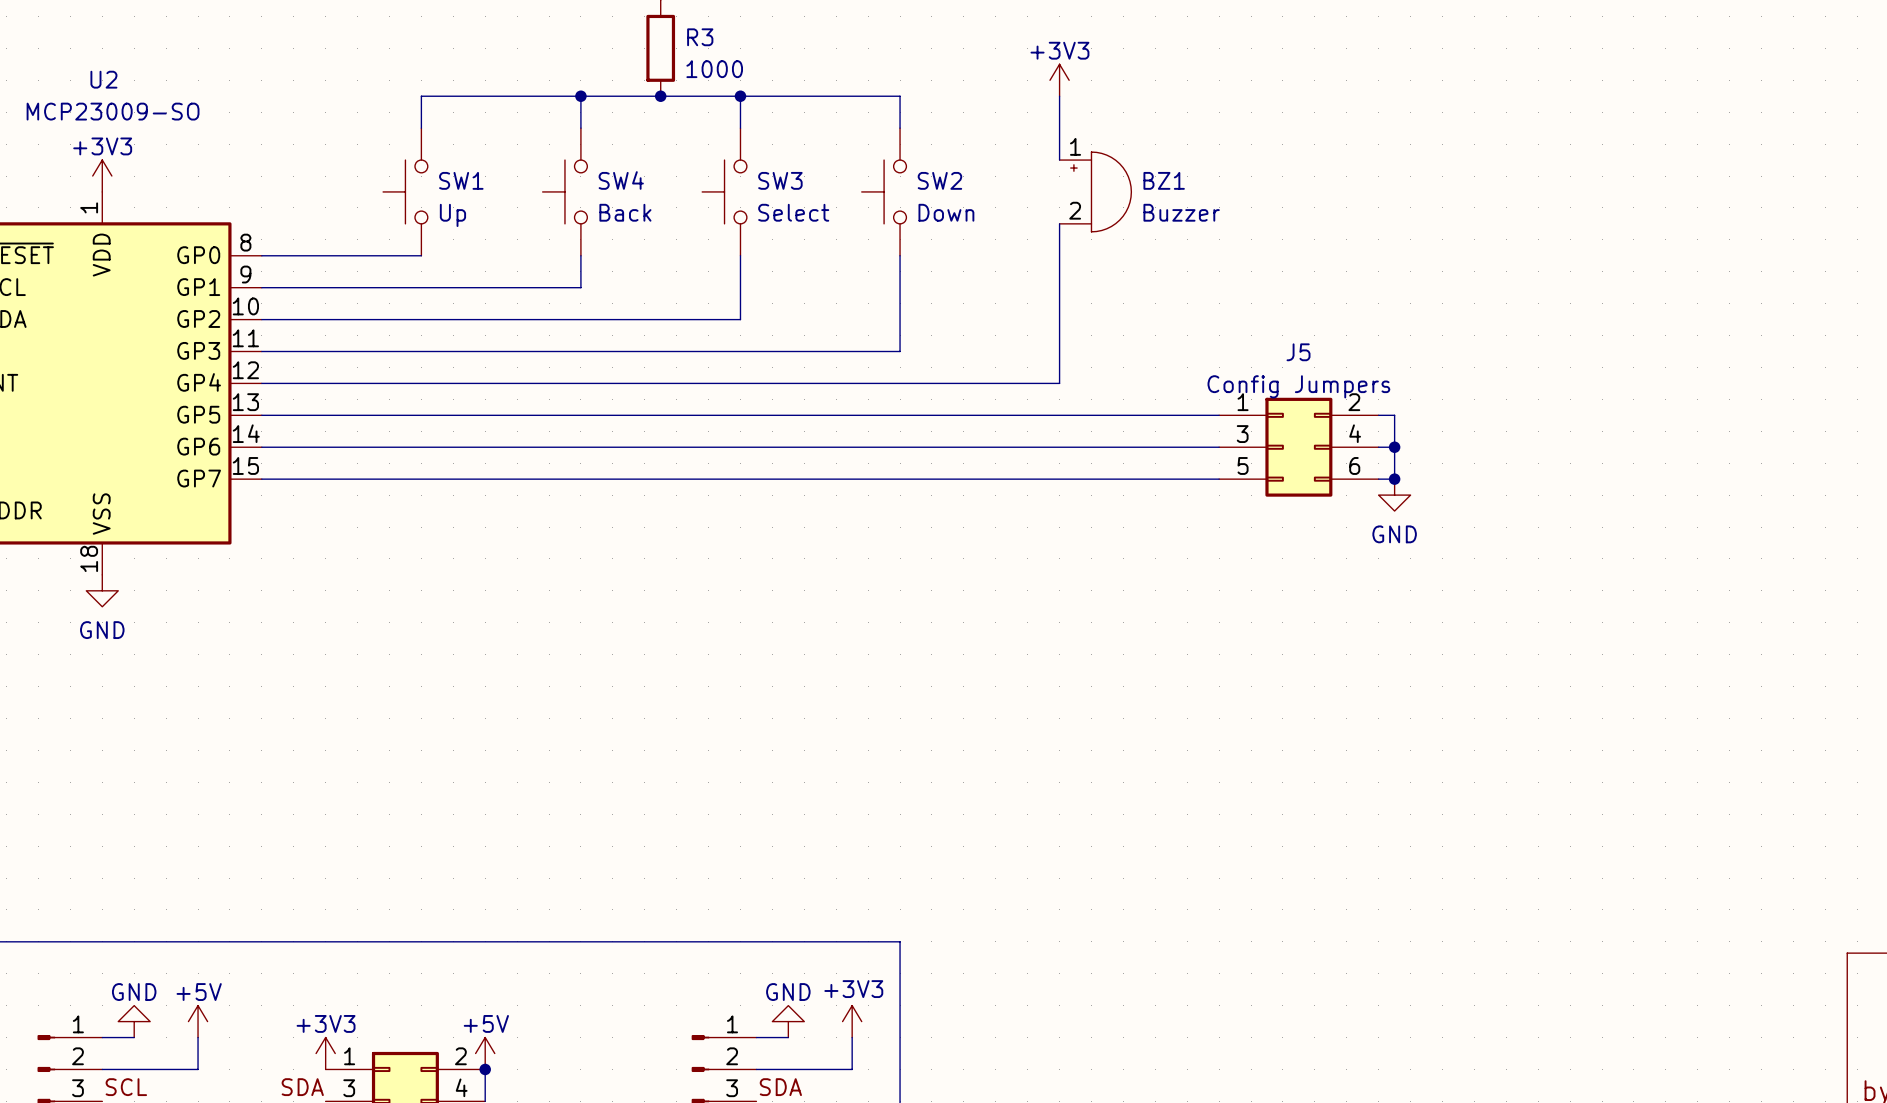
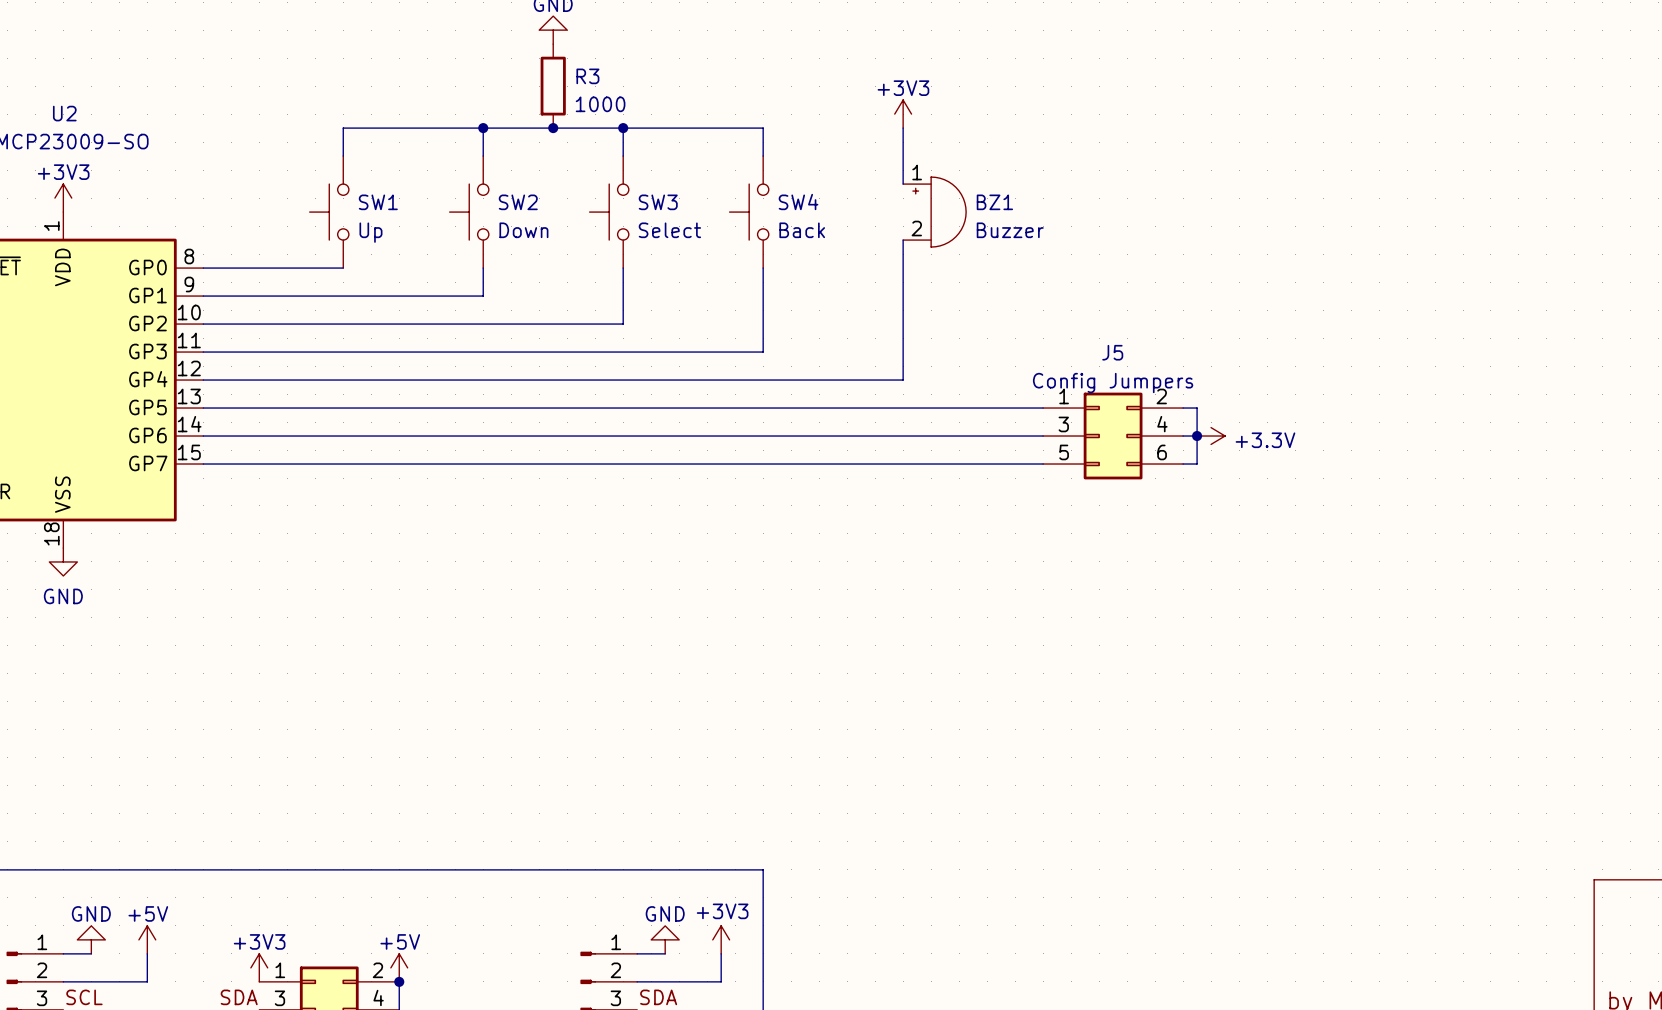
SW4 name: SW4 (621, 180) -> SW2 (518, 202)
SW2 name: SW2 (939, 180) -> SW4 (798, 202)
SW4 value: Back (625, 212) -> Down (523, 230)
SW2 value: Down (946, 212) -> Back (802, 230)
power symbol: none -> +3.3V (1211, 436)
junction: (1394, 479) -> none
power symbol: GND (1394, 495) -> none

